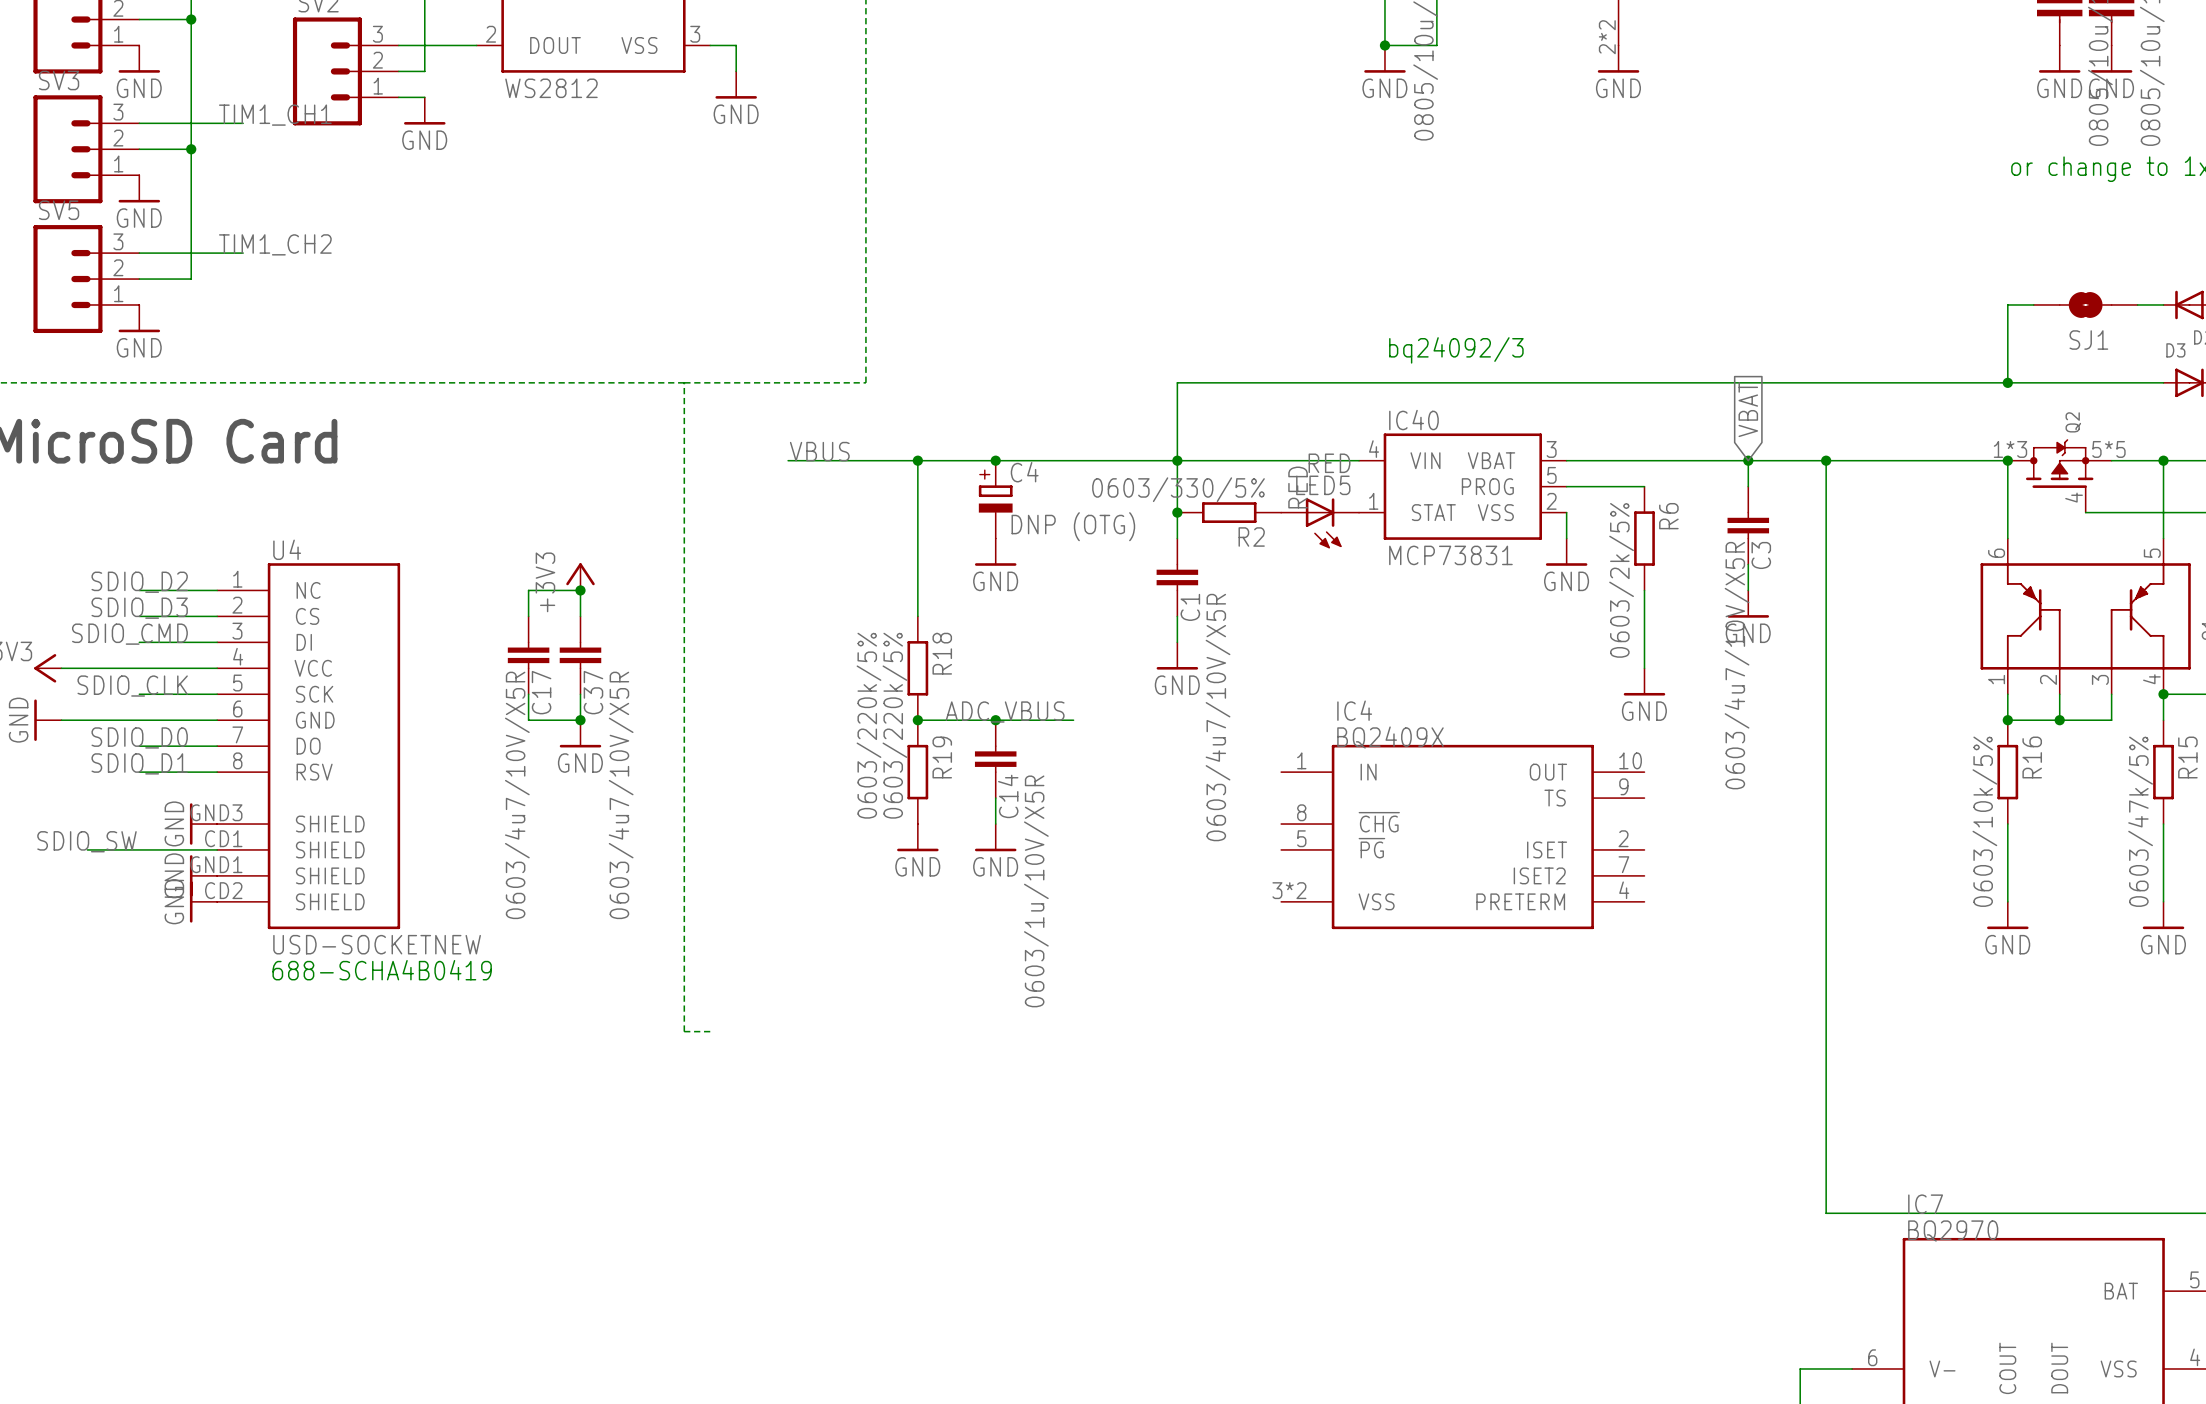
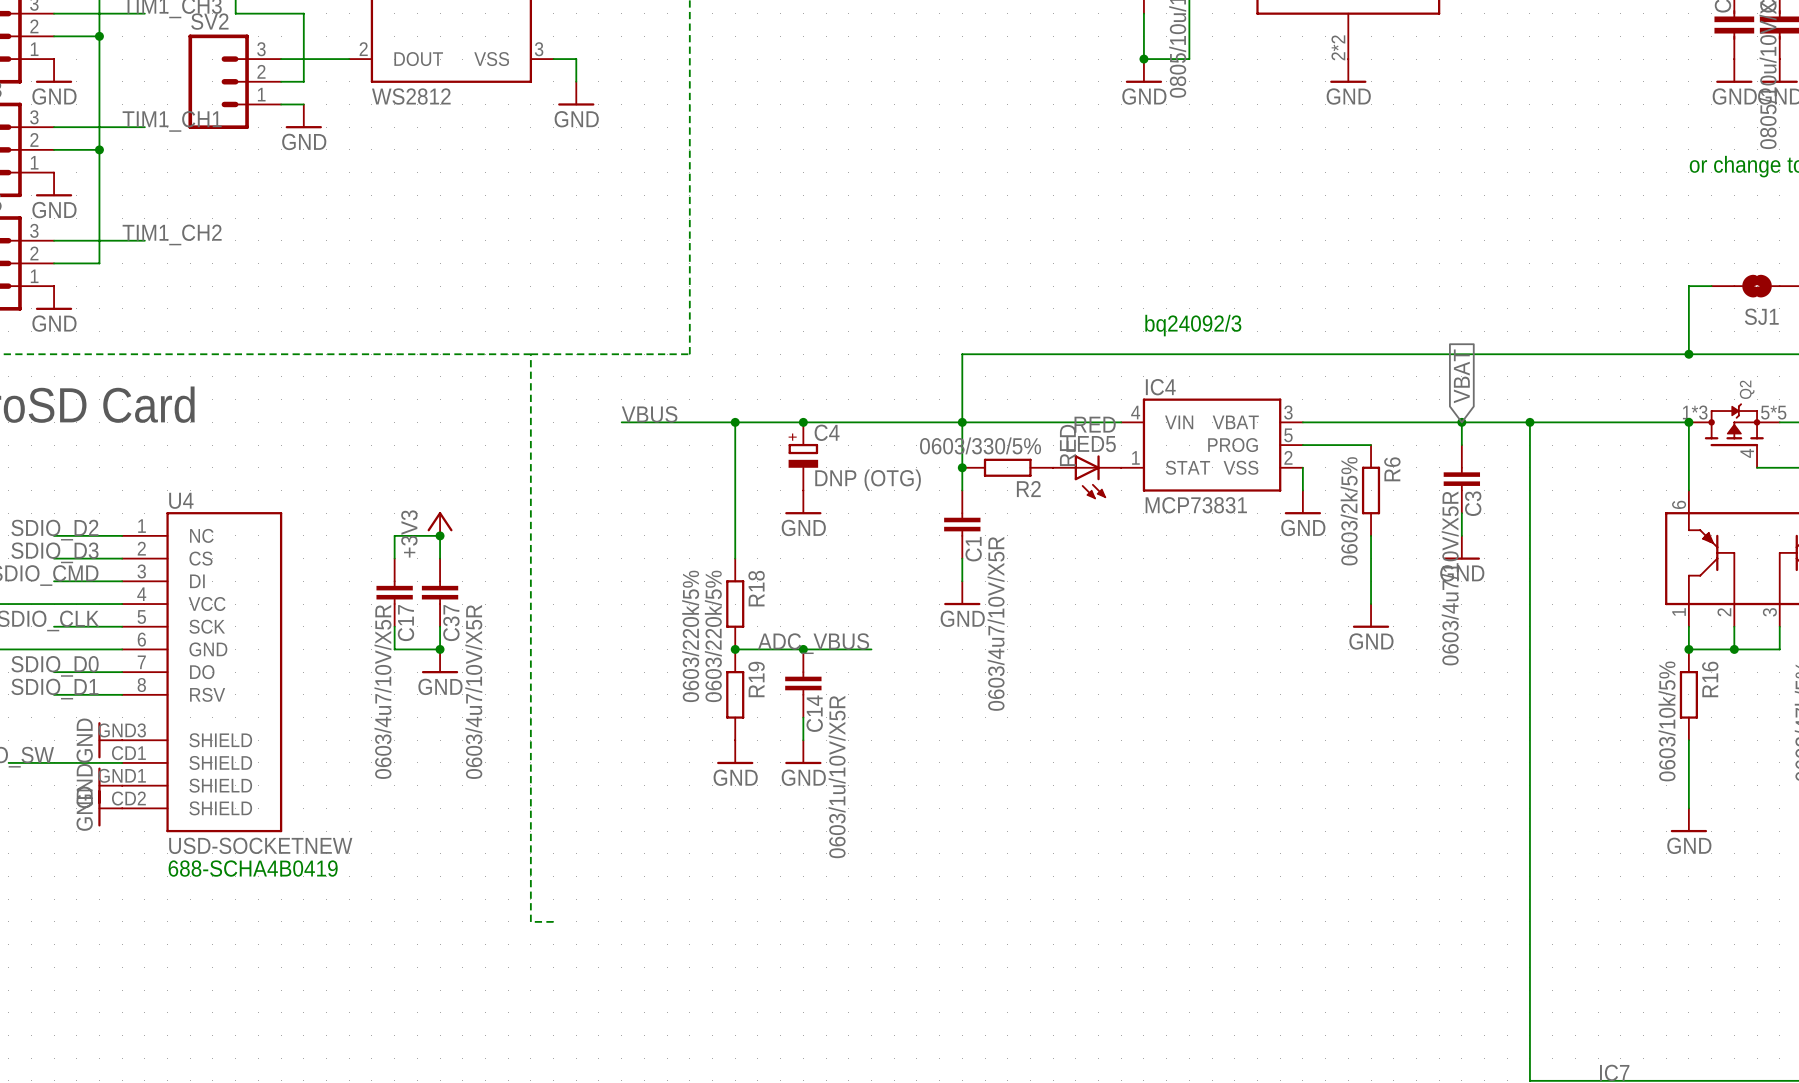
IC40 name: IC40 (1413, 420) -> IC4 (1160, 387)
IC4: BQ2409X (1462, 836) -> none

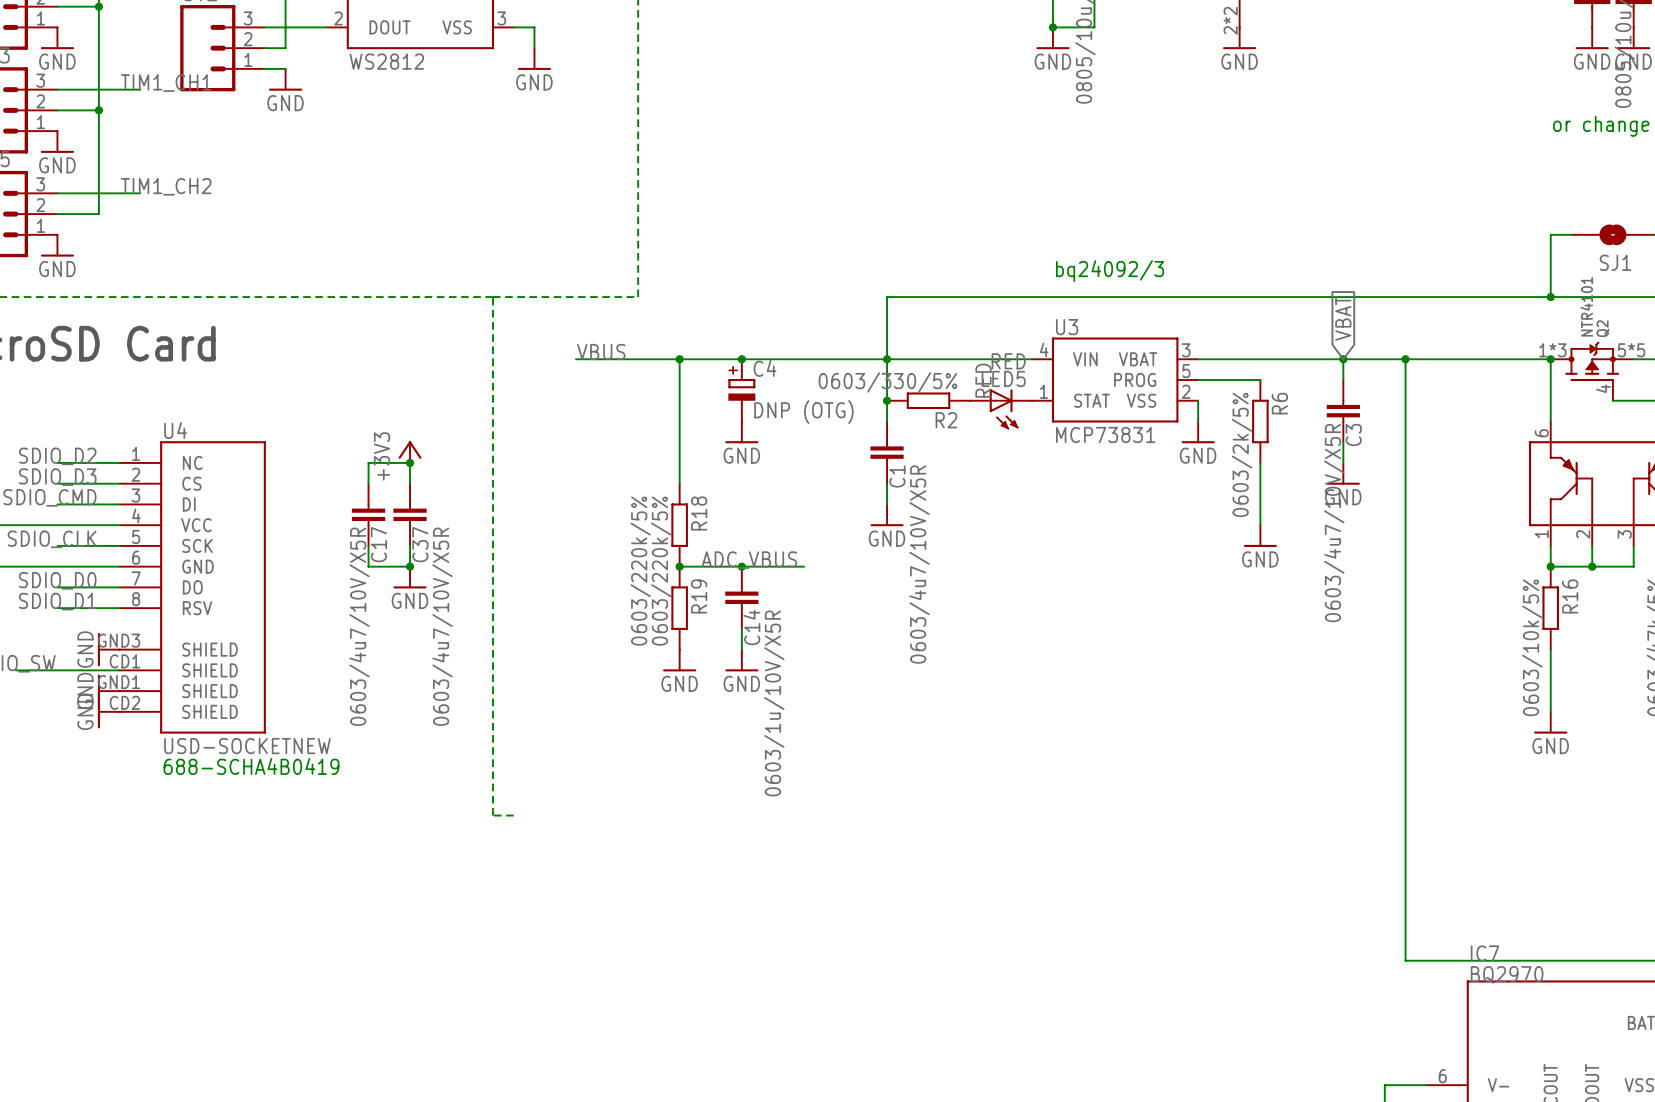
Q2 value: none -> NTR4101 (1586, 306)
IC4 name: IC4 (1160, 387) -> U3 (1067, 327)

